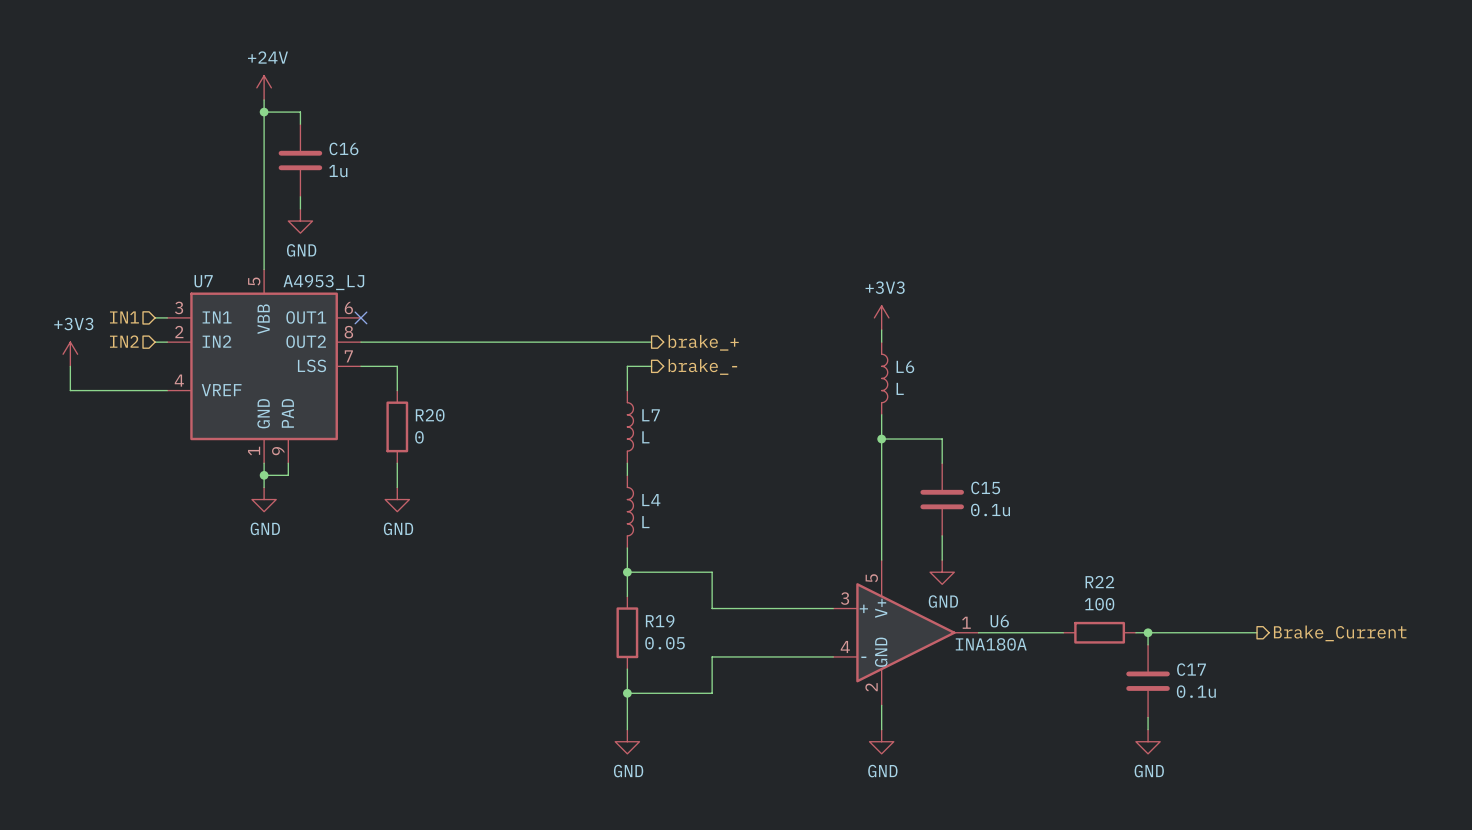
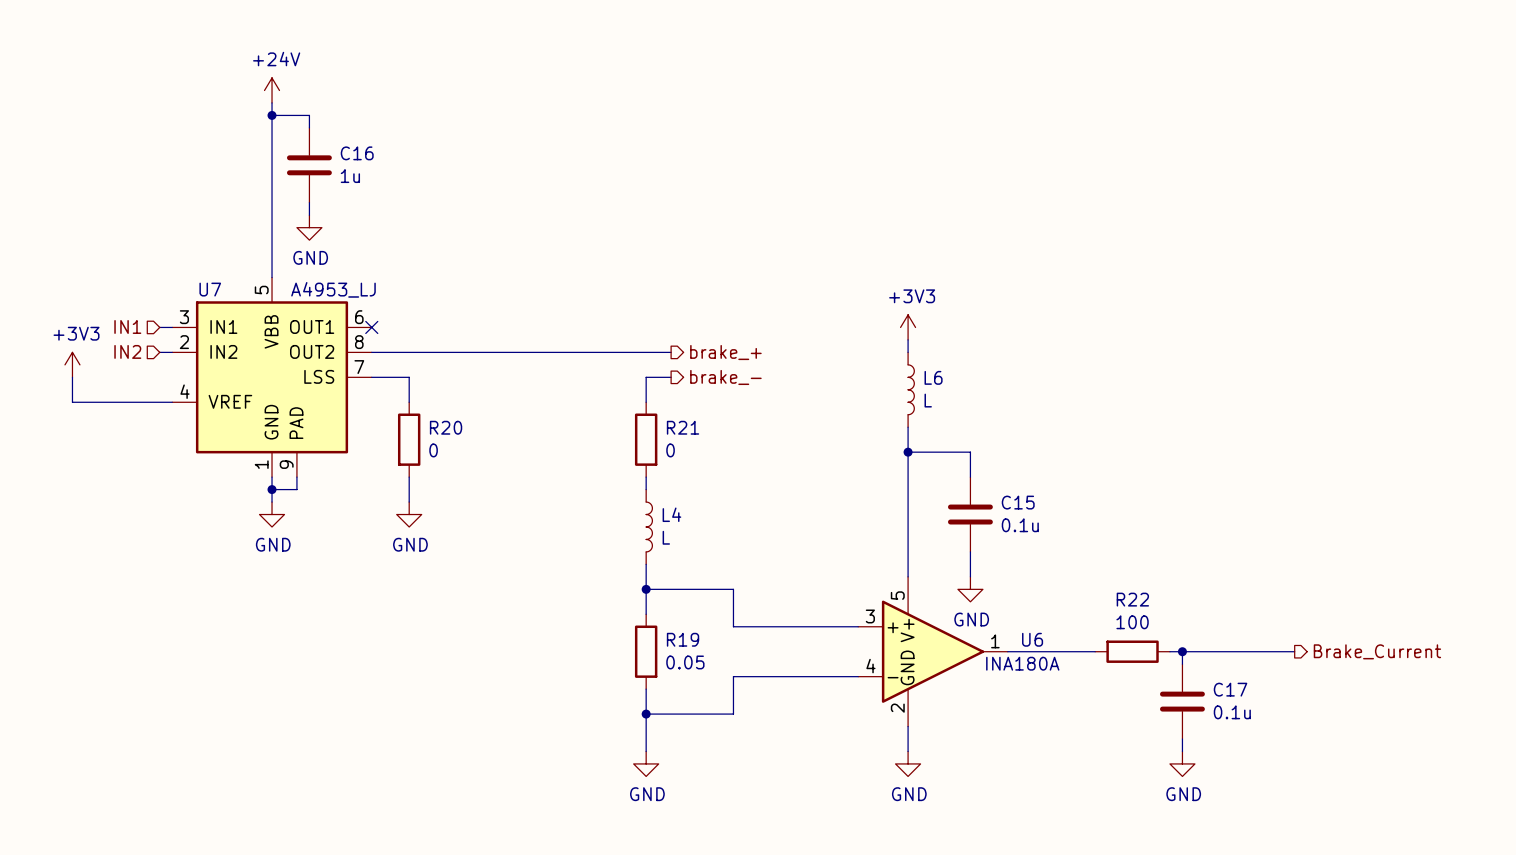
R21: none -> 0 (646, 439)
L7: L (630, 426) -> none

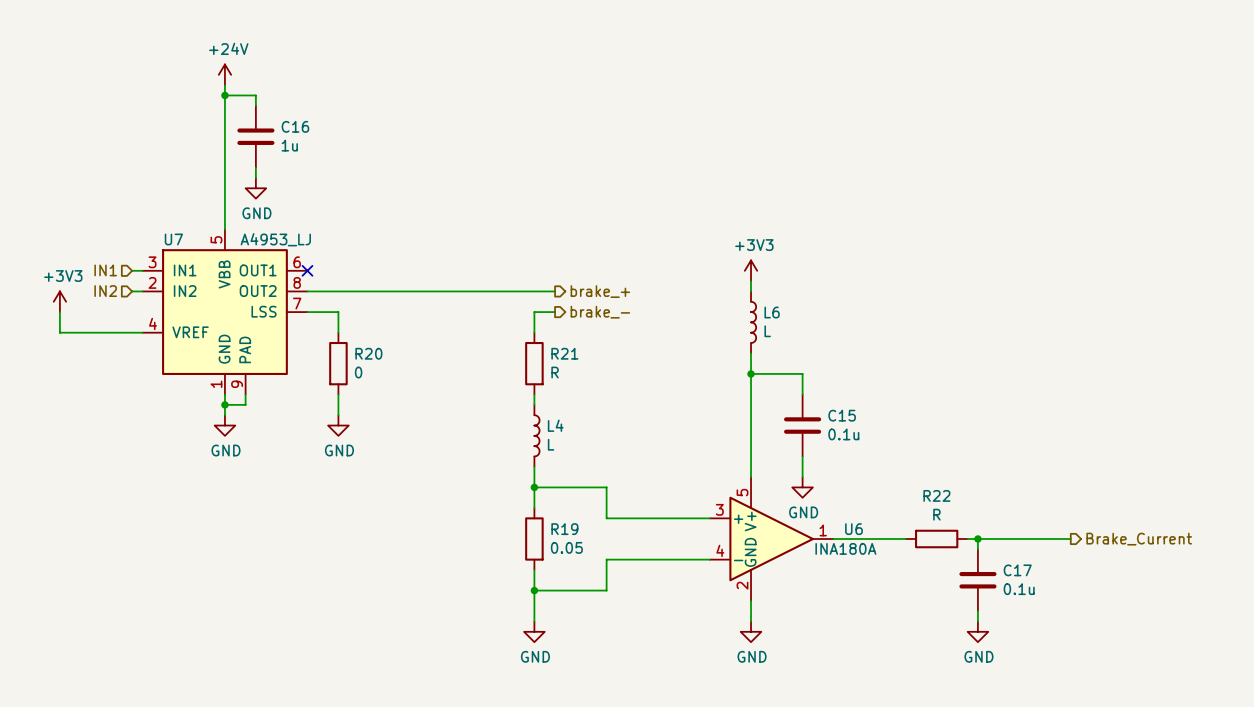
R21 value: 0 (670, 450) -> R (555, 372)
R22 value: 100 (1132, 622) -> R (936, 514)

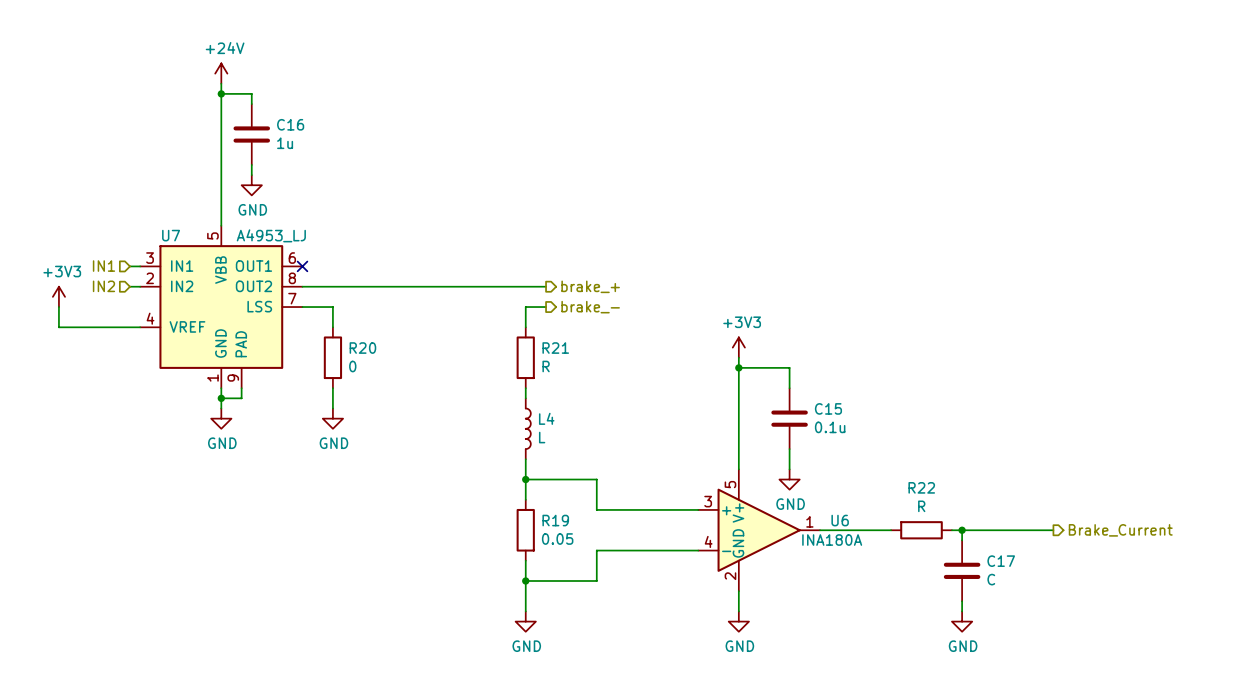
power symbol position: +3V3 (751, 270) -> +3V3 (738, 347)
wire: (751, 281) (751, 291) -> none
L6: L (753, 322) -> none
C17 value: 0.1u (1019, 589) -> C (991, 579)

